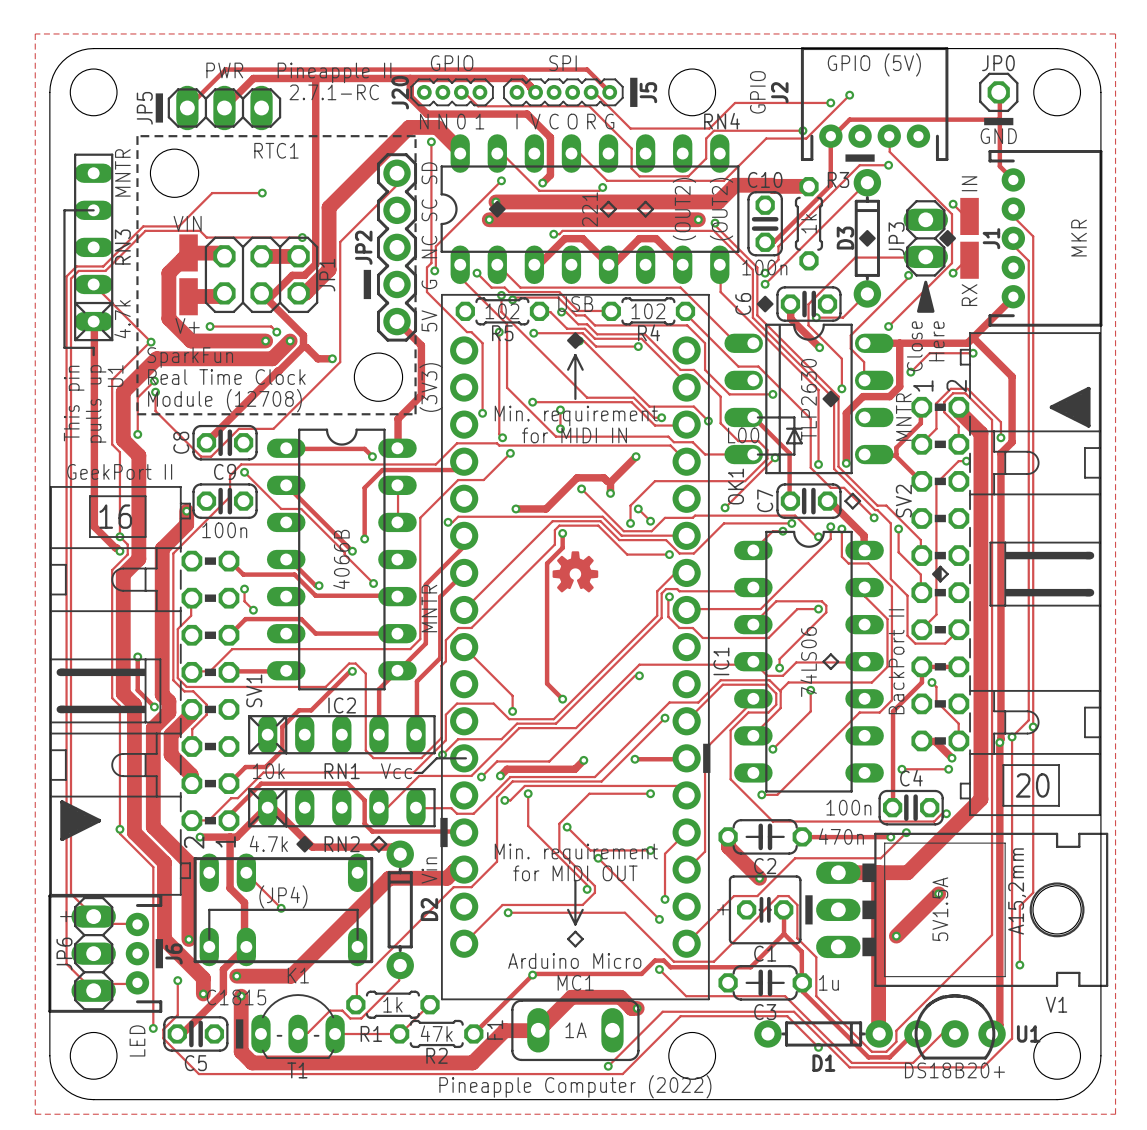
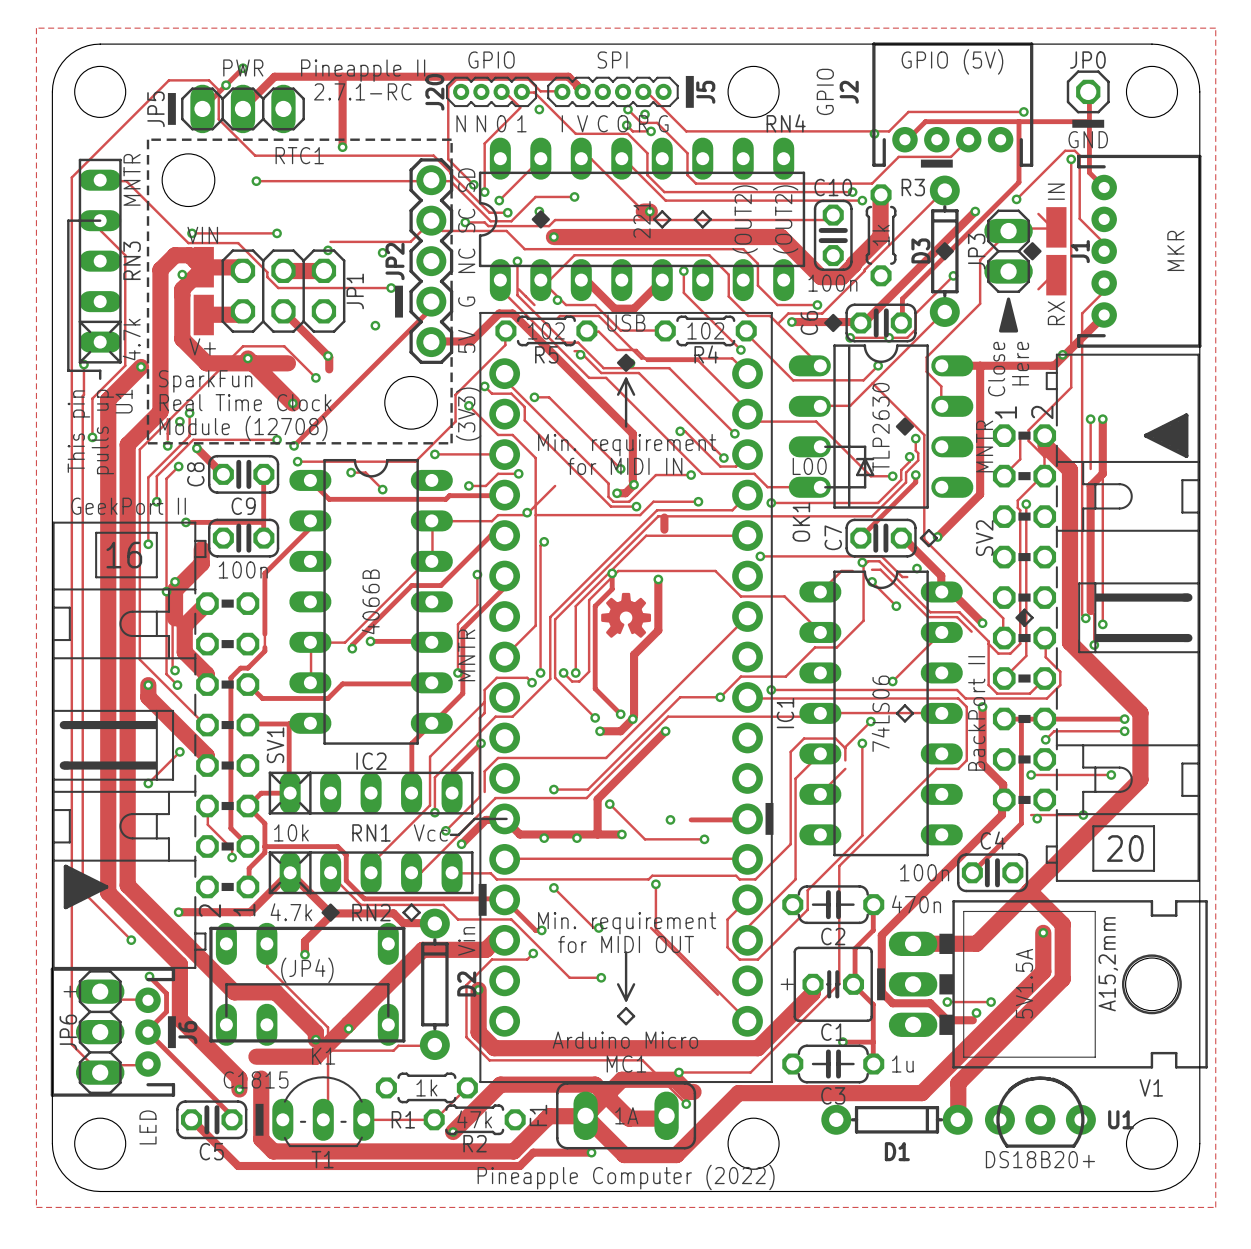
track: (224, 70) (587, 69) (609, 92) -> none
via: none -> (243, 68)
track: (410, 78) (410, 97) (426, 114) (527, 114) (550, 137) (550, 175) (542, 183) -> none
via: none -> (226, 85)
track: none -> (562, 91) (540, 91) (528, 79) (456, 79) (448, 87) (448, 159) (473, 184)
track: (849, 95) (834, 110) -> (1023, 111) (908, 111)
via: (849, 95) -> none
track: (830, 102) (735, 102) (709, 128) -> (889, 131) (772, 131)
via: (830, 102) -> none
track: (478, 106) (589, 106) (603, 120) -> (627, 109) (641, 122) (657, 122)
track: none -> (520, 107) (484, 143) (484, 192)
via: none -> (539, 109)
via: none -> (627, 109)
via: none -> (1023, 111)
via: none -> (644, 114)
track: none -> (1019, 121) (1019, 182) (902, 298) (901, 322)
track: none -> (626, 125) (632, 131) (651, 131)
via: none -> (626, 125)
via: none -> (651, 131)
track: (816, 128) (806, 138) (766, 138) (723, 180) (607, 180) -> (852, 192) (664, 192) (660, 188)
track: (802, 130) (713, 130) (706, 138) (706, 158) (688, 176) -> (968, 139) (950, 156) (898, 156) (872, 183) (749, 183)
track: (830, 136) (830, 185) (774, 242) (765, 242) -> none
track: (889, 136) (889, 151) (952, 214) (952, 263) (888, 326) -> none
track: (431, 141) (431, 263) (426, 267) (426, 292) (467, 332) (471, 332) (482, 343) (482, 381) -> (484, 386) (491, 393) (511, 393) (524, 407)
via: (431, 141) -> none
track: (315, 142) (315, 264) (304, 275) (292, 275) (270, 297) (261, 293) -> none
via: none -> (342, 147)
track: (460, 153) (459, 149) (436, 127) (409, 127) (329, 207) (329, 269) (305, 293) (298, 293) -> none
track: (497, 153) (502, 154) (539, 190) (599, 190) (602, 187) -> (540, 158) (499, 200)
track: (573, 154) (580, 154) (594, 168) -> (521, 91) (534, 92) (575, 133) (627, 133) (647, 153) (647, 175)
track: none -> (624, 159) (665, 200) (862, 200)
via: none -> (1071, 159)
track: (888, 165) (859, 165) (778, 246) (778, 259) (765, 273) -> none
via: (888, 165) -> none
track: none -> (431, 180) (450, 181) (490, 221) (511, 221) (535, 196) (574, 196)
via: none -> (256, 181)
track: (396, 174) (396, 185) (340, 242) (340, 362) (273, 428) (238, 428) (211, 456) (201, 456) (155, 411) -> (431, 181) (256, 181)
via: none -> (473, 184)
track: (501, 180) (435, 246) (434, 270) -> none
via: (501, 180) -> none
via: (542, 183) -> none
via: none -> (484, 192)
via: none -> (852, 192)
track: (808, 186) (735, 185) (718, 201) (597, 201) -> (881, 194) (880, 237) (841, 277) (821, 277) (780, 237) (553, 237)
via position: (602, 187) -> (649, 211)
via: none -> (574, 196)
via: none -> (499, 200)
via: none -> (862, 200)
track: (262, 193) (212, 193) (178, 226) (143, 226) (103, 266) (76, 266) (66, 276) (67, 965) -> (507, 212) (489, 212) (433, 155) (255, 155) (218, 119) (218, 90) (209, 80) (168, 80) (71, 177) (71, 1044)
via: (262, 193) -> none
track: (495, 201) (591, 201) -> (581, 158) (591, 159) (643, 211)
track: none -> (975, 211) (864, 322) (791, 322)
via: none -> (975, 211)
via: none -> (507, 212)
via position: (953, 204) -> (1016, 199)
track: none -> (833, 215) (828, 220) (555, 220) (549, 226) (488, 226) (484, 222) (465, 222)
track: (1013, 209) (1014, 217) (1033, 236) (1033, 892) (1019, 906) (1019, 965) -> none
track: none -> (100, 220) (100, 230) (125, 255) (125, 365) (92, 398) (92, 437)
via: none -> (465, 222)
track: (489, 219) (698, 219) -> none
via: (489, 219) -> none
via: (698, 219) -> none
track: none -> (192, 233) (277, 233)
via: none -> (192, 233)
via: none -> (277, 233)
track: (715, 223) (715, 225) (757, 267) (757, 315) (801, 359) -> none
via: (715, 223) -> none
via: none -> (553, 237)
track: none -> (330, 241) (410, 241) (431, 220) (442, 230) (506, 230) (524, 249) (743, 249) (757, 263) (757, 285) (777, 305) (817, 305)
track: (174, 230) (145, 230) (105, 270) (78, 270) (71, 278) (71, 893) (93, 916) -> (188, 243) (126, 181) (100, 180)
track: (200, 230) (206, 237) (302, 237) -> (216, 243) (238, 243) (267, 272) (267, 277) (278, 288) (391, 288)
track: (553, 234) (559, 234) (562, 230) (713, 230) (752, 269) (752, 317) (834, 398) (834, 468) (890, 523) (890, 579) -> none
via: (553, 234) -> none
track: (1013, 238) (1014, 246) (1028, 260) (1028, 720) (1012, 737) (1012, 1038) (983, 1067) (849, 1067) (794, 1011) (662, 1011) (608, 1066) -> (1104, 251) (1104, 243) (1079, 218) (1079, 155) (1074, 150) (1065, 150) (1016, 199)
via: none -> (382, 252)
track: none -> (517, 261) (517, 295) (564, 342) (578, 342) (603, 368) (669, 368) (734, 433)
via: none -> (517, 261)
track: none -> (203, 267) (189, 255) (175, 255) (160, 269) (160, 411) (127, 444) (127, 885) (234, 992) (275, 992) (315, 1032) (315, 1039)
track: (794, 255) (765, 284) -> (864, 269) (822, 313) (788, 313) (777, 323)
track: none -> (683, 271) (683, 292) (740, 349)
via: none -> (683, 271)
track: (925, 256) (855, 257) (808, 304) (808, 325) (841, 358) (841, 388) -> none
via: none -> (182, 274)
via: none -> (953, 275)
track: (534, 264) (539, 264) (564, 238) (582, 238) (608, 264) (614, 263) (639, 238) (656, 238) (682, 264) -> (581, 280) (586, 280) (614, 308) (634, 308) (662, 280)
track: (719, 264) (720, 292) (818, 389) (818, 464) -> none
track: none -> (1104, 283) (1104, 291) (1082, 313) (1082, 614) (1085, 618)
via: (434, 270) -> none
via: none -> (391, 288)
track: (460, 273) (460, 277) (507, 324) (507, 387) (556, 436) (668, 436) (673, 442) -> (500, 289) (589, 377) (606, 377) (702, 473) (733, 473)
via: (477, 273) -> none
via: (765, 273) -> none
via: (953, 273) -> none
track: (908, 275) (899, 286) -> (1056, 227) (1011, 228) (1008, 231) (980, 260) (980, 303)
via: (908, 275) -> none
via: none -> (557, 300)
track: (93, 284) (151, 342) (112, 379) (112, 444) (119, 452) (119, 536) (127, 544) (127, 554) (112, 570) (112, 698) (119, 705) (119, 833) (153, 867) (153, 1028) -> none
track: none -> (431, 301) (431, 308) (294, 445)
via: (765, 284) -> none
track: (491, 287) (504, 287) (509, 292) (559, 292) (578, 310) -> (595, 305) (620, 330) (629, 330)
track: (547, 287) (680, 287) (736, 343) (752, 343) -> (540, 280) (550, 279) (574, 255) (709, 255) (728, 274) (728, 296) (748, 315) (770, 315) (819, 365)
via: none -> (817, 305)
track: (501, 295) (501, 312) (587, 397) (633, 397) (653, 417) (661, 417) -> none
via: (501, 295) -> none
track: (550, 297) (558, 297) (576, 315) (584, 315) (594, 325) (687, 325) (705, 343) (705, 369) (729, 394) -> (598, 315) (641, 358) (732, 358) (747, 373)
via: (512, 299) -> none
via: none -> (791, 322)
track: (790, 304) (790, 318) (819, 347) -> none
via: none -> (375, 325)
track: none -> (505, 330) (505, 345) (455, 394) (455, 421) (415, 461) (297, 461)
track: (561, 312) (566, 312) (578, 324) (587, 324) (597, 334) (644, 334) (680, 369) (693, 369) (720, 396) (720, 423) (738, 441) (758, 441) (767, 450) (767, 458) (745, 481) -> (915, 438) (918, 460) (906, 472) (906, 482) (872, 516) (811, 516)
via: (561, 312) -> none
track: none -> (850, 337) (889, 337)
via: none -> (850, 337)
track: (832, 317) (842, 317) -> (907, 337) (915, 329) (915, 313) (953, 275)
track: none -> (918, 337) (850, 405) (820, 406)
track: (93, 321) (94, 526) (119, 551) -> none
track: (397, 321) (421, 345) (421, 395) (398, 418) (397, 448) -> (431, 342) (471, 341) (499, 313) (512, 313) (632, 433) (634, 484) (625, 493) (617, 493)
track: (210, 326) (271, 326) (276, 332) -> none
via: (210, 326) -> none
via: (888, 326) -> none
via: none -> (740, 349)
track: none -> (574, 351) (579, 351) (601, 373) (638, 373) (723, 458)
via: (276, 332) -> none
track: (499, 332) (499, 434) (502, 437) -> none
via: (499, 332) -> none
track: (533, 333) (582, 333) (596, 346) (638, 346) -> none
via: none -> (328, 356)
track: none -> (247, 358) (292, 403)
via: none -> (247, 358)
track: (973, 337) (1012, 376) (1012, 392) -> none
via: (265, 341) -> none
track: (290, 341) (272, 358) (156, 358) (123, 392) (123, 440) (138, 455) (138, 559) (123, 574) (123, 693) (134, 704) (134, 832) (164, 862) (164, 939) (166, 941) -> (141, 366) (108, 399) (108, 892) (179, 964) (179, 1019)
via: (290, 341) -> none
track: (579, 341) (583, 341) (649, 406) (693, 406) (708, 421) -> none
track: none -> (83, 364) (82, 891) (131, 940)
via: none -> (83, 364)
via position: (151, 342) -> (141, 366)
via: (638, 346) -> none
via position: (819, 347) -> (878, 365)
track: none -> (504, 373) (505, 380) (608, 483) (608, 496) (613, 501) (629, 501) (655, 475) (691, 475)
track: (973, 353) (929, 353) (910, 372) -> none
via position: (973, 353) -> (1062, 354)
via: none -> (315, 377)
track: (728, 356) (738, 366) (758, 366) (810, 418) (810, 467) (830, 487) (844, 487) (874, 517) -> (793, 380) (863, 380) (878, 365)
track: (332, 358) (317, 358) (303, 346) (206, 442) -> (196, 448) (223, 474)
via: (332, 358) -> none
via: none -> (484, 386)
track: none -> (534, 397) (549, 397) (620, 468)
via: none -> (534, 397)
via: (910, 372) -> none
via: none -> (292, 403)
via: none -> (468, 405)
track: (154, 381) (137, 397) (137, 434) -> none
via: (154, 381) -> none
track: none -> (189, 413) (189, 436) (148, 477) (148, 544)
via: none -> (189, 413)
track: (899, 386) (889, 396) (863, 396) (846, 413) (846, 463) -> (980, 413) (980, 494) (937, 536)
track: none -> (747, 414) (755, 421) (794, 421)
via: (841, 388) -> none
via: (155, 392) -> none
via: none -> (1090, 419)
via: none -> (1102, 419)
track: (482, 393) (482, 413) -> (524, 420) (610, 506) (636, 506)
track: (953, 393) (965, 393) (992, 419) (992, 935) (896, 1030) (896, 1041) (886, 1051) (871, 1051) (816, 996) (816, 957) (797, 938) (797, 904) (788, 896) (778, 896) (713, 961) (673, 961) (624, 912) (508, 912) -> (1038, 420) (1071, 387) (1071, 159)
via: none -> (179, 421)
track: (749, 394) (772, 394) -> (816, 421) (870, 476) (892, 476)
via: (772, 394) -> none
track: (838, 396) (838, 466) (877, 505) (886, 505) (920, 540) (921, 555) -> (913, 424) (924, 434) (924, 539) (978, 594)
track: (532, 402) (631, 402) (655, 425) (686, 425) -> (680, 431) (685, 431) (720, 466) (736, 466) (746, 455)
via: (532, 402) -> none
via: none -> (680, 431)
via: none -> (734, 433)
track: (921, 407) (920, 423) (896, 447) (895, 455) -> none
via: none -> (92, 437)
track: (560, 409) (560, 428) -> none
via: (560, 409) -> none
via: none -> (915, 438)
track: (936, 409) (936, 403) (950, 388) (967, 388) (1000, 422) -> (1090, 419) (1090, 451)
track: none -> (277, 439) (193, 439) (156, 476) (156, 501)
via: none -> (277, 439)
track: (959, 412) (980, 433) (980, 799) (907, 872) (896, 872) -> (1045, 441) (1045, 445) (1070, 470) (1070, 642) (1140, 713) (1140, 779) (976, 943)
via: (482, 413) -> none
via: none -> (167, 445)
via: none -> (294, 445)
via: (661, 417) -> none
track: (753, 417) (789, 453) (790, 501) -> (915, 475) (915, 482) (860, 538)
via: none -> (196, 448)
via: (708, 421) -> none
track: none -> (434, 454) (504, 454)
via: none -> (434, 454)
track: none -> (909, 456) (909, 461) (901, 470) (901, 479) (878, 502) (771, 502)
via: none -> (909, 456)
via: none -> (723, 458)
via position: (560, 428) -> (620, 468)
via: none -> (297, 461)
via: (137, 434) -> none
track: none -> (178, 466) (166, 478) (166, 674) (177, 685)
via: none -> (178, 466)
via: (502, 437) -> none
via: (1000, 437) -> none
track: none -> (351, 472) (365, 472) (382, 489)
via: none -> (351, 472)
track: none -> (263, 474) (263, 538)
via: none -> (518, 473)
track: none -> (1102, 473) (1102, 624)
track: (457, 443) (497, 443) (499, 445) (670, 445) (686, 461) -> (496, 475) (518, 473)
via: none -> (691, 475)
via: none -> (915, 475)
via: none -> (892, 476)
track: (286, 448) (364, 448) (372, 456) -> (311, 481) (329, 499) (445, 499) (449, 495) (504, 495)
via: none -> (634, 484)
via: none -> (468, 485)
track: (446, 453) (435, 464) (241, 464) (230, 475) (230, 496) (173, 553) (173, 680) (184, 691) (193, 691) (206, 704) (206, 714) (192, 729) (191, 746) -> (485, 485) (468, 485)
via: (510, 453) -> none
track: (895, 455) (921, 481) -> none
via position: (372, 456) -> (382, 489)
track: (636, 456) (610, 482) (603, 477) (577, 477) (545, 508) (515, 508) -> none
via: (636, 456) -> none
track: (775, 457) (725, 507) -> none
via: (775, 457) -> none
via: none -> (617, 493)
track: none -> (747, 495) (732, 510) (657, 510) (550, 617) (550, 679) (512, 716) (495, 716) (434, 777) (434, 812)
track: (966, 461) (958, 461) (936, 483) -> (1044, 476) (1042, 476) (1017, 500) (1020, 518)
via position: (966, 461) -> (1026, 504)
track: (463, 462) (455, 470) (382, 470) (364, 487) (364, 539) -> none
via: (846, 463) -> none
via: (818, 464) -> none
via: none -> (156, 501)
track: none -> (698, 501) (653, 501) (640, 515) (535, 515)
via: none -> (698, 501)
via: none -> (771, 502)
track: none -> (1026, 504) (1026, 655) (1020, 662)
track: (244, 472) (281, 508) (301, 508) (373, 583) -> none
via: (244, 472) -> none
via: none -> (636, 506)
via: none -> (527, 512)
track: (655, 481) (630, 505) (630, 523) -> (712, 516) (658, 516) (555, 619) (555, 677) (595, 717)
track: (286, 485) (352, 551) -> (310, 520) (309, 528) (264, 573) (264, 634)
track: none -> (431, 520) (491, 521)
track: (452, 485) (420, 517) (420, 639) (410, 649) (232, 649) (210, 671) (191, 672) -> (315, 377) (284, 346) (243, 346) (139, 449) (139, 659) (204, 723) (207, 725)
track: none -> (185, 522) (263, 522)
via: none -> (185, 522)
track: (581, 488) (623, 531) -> none
via: (581, 488) -> none
via: (610, 493) -> none
track: none -> (504, 535) (490, 535) (440, 585) (411, 585) (352, 645) (352, 648)
track: none -> (747, 535) (646, 535) (575, 606) (575, 672)
via: none -> (937, 536)
track: none -> (544, 541) (540, 545) (540, 672)
via: none -> (148, 544)
via: (725, 507) -> none
via position: (515, 508) -> (544, 541)
track: (638, 508) (650, 521) -> none
via: (638, 508) -> none
via: (186, 511) -> none
track: none -> (760, 556) (881, 556) (902, 577) (907, 577)
via: none -> (760, 556)
via: (874, 517) -> none
via: (650, 521) -> none
track: none -> (431, 561) (425, 562) (345, 642) (310, 642) (310, 682)
track: (448, 522) (452, 522) (458, 516) (602, 516) (621, 535) (686, 535) -> none
via position: (448, 522) -> (477, 574)
via: (630, 523) -> none
track: (791, 523) (723, 523) (693, 553) (679, 553) -> (820, 632) (784, 596) (739, 595)
track: (830, 526) (830, 539) (792, 576) -> (916, 598) (879, 561) (868, 561) (863, 566) (863, 620)
via: (830, 526) -> none
track: (841, 528) (841, 556) -> none
track: (898, 528) (898, 552) -> none
via: (898, 528) -> none
track: none -> (872, 569) (880, 569) (927, 617) (957, 617)
track: (651, 531) (665, 517) (692, 517) (695, 515) (795, 515) (818, 536) -> (709, 570) (715, 570) (725, 580)
via: (782, 531) -> none
track: none -> (477, 574) (477, 604) (457, 624) (457, 672)
via: (119, 536) -> none
via: (818, 536) -> none
via: (364, 539) -> none
track: none -> (658, 579) (658, 630) (634, 654) (632, 719) (620, 731) (600, 731)
via: none -> (658, 579)
track: (666, 540) (619, 540) (600, 521) (552, 521) (492, 581) -> (468, 405) (498, 434) (512, 434) (535, 458) (535, 625)
via: none -> (175, 581)
track: none -> (872, 581) (896, 606)
via: none -> (872, 581)
track: (554, 544) (554, 530) (559, 525) (598, 525) (627, 554) (669, 554) -> (603, 585) (618, 570) (678, 570)
via: none -> (166, 591)
track: none -> (941, 591) (953, 594) (982, 623)
via: (119, 551) -> none
via: (352, 551) -> none
via: (669, 554) -> none
track: (541, 557) (471, 627) (457, 629) -> (589, 600) (589, 671) (579, 681) (572, 681) (563, 672)
track: (286, 559) (290, 560) (315, 585) (319, 585) -> none
track: none -> (207, 603) (184, 625) (184, 652) (206, 674) (207, 684)
track: (228, 561) (243, 574) (294, 574) (315, 595) (341, 595) -> none
via: none -> (896, 606)
track: (848, 563) (868, 563) (878, 573) -> (924, 606) (930, 612) (959, 612) (970, 623)
track: (1000, 567) (999, 1025) (992, 1033) -> (1090, 611) (1094, 614) (1094, 645)
track: (464, 572) (440, 596) (440, 658) (416, 681) (416, 714) -> (481, 743) (453, 771)
track: (686, 573) (675, 573) (657, 591) (657, 615) (553, 719) (509, 719) (493, 703) (457, 703) -> (746, 617) (606, 757) (496, 759)
track: (162, 574) (162, 694) (168, 701) (168, 712) (153, 728) (153, 827) (188, 862) (188, 939) -> (175, 618) (172, 620) (172, 668) (175, 670)
via: none -> (1085, 618)
via: none -> (982, 623)
via: none -> (1102, 624)
via: (373, 583) -> none
via: (319, 585) -> none
track: (891, 586) (891, 700) (887, 704) -> (966, 719) (966, 760)
track: (753, 587) (749, 591) (679, 591) (677, 589) (666, 589) (661, 593) (661, 617) (556, 723) (517, 723) (501, 739) -> none
track: (864, 587) (865, 596) (887, 619) (887, 655) -> (941, 632) (892, 681)
via: (244, 589) -> none
track: none -> (1044, 638) (1045, 657) (1060, 671) (1060, 685) (1046, 698) (965, 698) (957, 689) (771, 689)
via: none -> (370, 641)
track: (669, 596) (668, 616) (680, 627) -> (553, 789) (587, 789) (680, 697) (720, 697) (740, 676)
via: (669, 596) -> none
track: (936, 597) (936, 614) -> (1020, 643) (1010, 653) (998, 653) (988, 643)
track: (191, 598) (191, 615) (177, 629) (177, 678) (186, 686) (325, 686) (349, 663) (355, 663) (365, 673) (365, 750) (373, 758) (421, 758) -> (445, 830) (457, 818)
via: none -> (1094, 645)
track: (244, 601) (253, 610) -> none
track: (768, 601) (760, 609) (686, 610) -> (836, 647) (814, 647) (785, 676) (754, 676)
via: none -> (352, 648)
track: (818, 609) (797, 609) (768, 638) (702, 638) (692, 627) -> none
via: (818, 609) -> none
via: (253, 610) -> none
via: none -> (175, 670)
via: none -> (457, 672)
via: none -> (540, 672)
via: none -> (563, 672)
via: none -> (575, 672)
track: (753, 624) (776, 601) (821, 601) (826, 605) (826, 612) (779, 659) (779, 668) -> none
track: none -> (496, 677) (527, 677) (532, 682)
via: none -> (892, 681)
track: (397, 633) (315, 633) (301, 619) (245, 619) (228, 635) -> (431, 682) (342, 683) (328, 698) (262, 698) (247, 684)
via: none -> (532, 682)
via: none -> (148, 685)
via: none -> (177, 685)
track: (547, 639) (547, 683) (562, 699) -> (595, 688) (620, 714)
via: none -> (771, 689)
via: none -> (720, 697)
track: (464, 647) (512, 695) (512, 711) -> none
track: none -> (747, 697) (958, 698) (966, 706)
track: none -> (484, 702) (430, 756) (430, 805) (371, 863) (371, 872)
track: none -> (982, 706) (982, 764) (1003, 784) (1004, 799) (1002, 802) (1002, 815) (881, 935) (881, 992) (892, 1003) (930, 1003) (947, 1020) (972, 1020)
via: none -> (982, 706)
track: (137, 656) (137, 690) (154, 706) -> none
via: (137, 656) -> none
track: (753, 661) (767, 675) (782, 675) (796, 662) (864, 661) -> (820, 713) (941, 713)
via: none -> (620, 714)
track: (639, 664) (576, 728) (519, 728) (471, 775) (419, 775) -> (695, 716) (668, 716) (586, 798) (545, 798)
via: none -> (595, 717)
via: none -> (632, 719)
track: (887, 666) (871, 682) (788, 682) (780, 690) -> none
track: (921, 666) (921, 682) (893, 711) (893, 807) -> (1021, 719) (1021, 823) (972, 872)
track: none -> (1044, 718) (1124, 719)
via: none -> (1124, 719)
via: (779, 668) -> none
track: none -> (870, 721) (844, 747)
via: none -> (870, 721)
track: none -> (289, 723) (290, 793) (261, 793) (247, 806) (264, 823) (264, 852) (249, 868) (249, 880)
track: (352, 671) (350, 671) (311, 710) (299, 710) (282, 726) (282, 750) (265, 767) (245, 767) (228, 783) -> (264, 647) (264, 651) (247, 668) (240, 668) (230, 677) (230, 828) (247, 846)
via: (352, 671) -> none
track: (639, 675) (634, 675) (549, 761) (497, 761) (481, 777) -> none
via: (639, 675) -> none
via: none -> (600, 731)
track: none -> (665, 731) (597, 799) (597, 834)
via: none -> (665, 731)
track: none -> (1124, 731) (1054, 731) (1045, 739)
via: none -> (1124, 731)
track: (931, 682) (936, 686) (936, 701) (958, 723) (958, 740) -> none
via: (931, 682) -> none
track: (738, 684) (722, 684) (686, 721) -> (804, 738) (790, 751) (790, 844) (755, 879) (739, 879) (736, 875) (652, 875) (648, 879) (515, 879)
via: none -> (1045, 739)
via: none -> (481, 743)
via: none -> (862, 743)
track: (810, 690) (810, 711) (772, 749) -> none
via: (810, 690) -> none
track: none -> (179, 751) (148, 783)
via: none -> (179, 751)
via: (562, 699) -> none
track: (752, 699) (752, 701) (705, 749) (705, 851) (687, 869) -> (795, 841) (795, 879) (748, 926) (748, 940)
track: (776, 704) (768, 712) (748, 712) (730, 730) -> (819, 754) (795, 778) (795, 788)
via: (154, 706) -> none
track: (191, 709) (191, 714) (171, 734) (171, 754) (191, 774) (191, 783) -> (207, 765) (206, 755) (148, 697) (148, 685)
via position: (512, 711) -> (553, 789)
track: (776, 712) (780, 708) (780, 691) (769, 680) (720, 680) (698, 702) (669, 702) (594, 777) -> (704, 839) (647, 839)
track: (665, 718) (601, 781) (512, 781) (497, 797) (497, 861) (471, 887) -> (533, 953) (527, 959) (512, 959)
via: (665, 718) -> none
track: none -> (1031, 774) (1111, 774)
via: none -> (1031, 774)
via: none -> (1111, 774)
via: none -> (148, 783)
via: (1033, 726) -> none
track: (445, 733) (445, 740) (413, 772) (263, 772) (237, 798) (231, 798) (208, 820) (191, 820) -> none
via: (1012, 737) -> none
track: (458, 739) (442, 754) -> (498, 798) (495, 798) (455, 838)
track: (921, 740) (935, 741) (952, 758) -> none
via: (999, 742) -> none
via: none -> (609, 804)
track: none -> (207, 806) (207, 824) (232, 849) (232, 857)
via: (772, 749) -> none
via: none -> (434, 812)
via: (442, 754) -> none
track: none -> (1031, 815) (1083, 815)
via: none -> (1083, 815)
via: none -> (670, 819)
via: (634, 759) -> none
track: (583, 760) (574, 769) (507, 769) (500, 775) -> none
via: (583, 760) -> none
via: none -> (445, 830)
track: (901, 769) (948, 769) -> none
via: (901, 769) -> none
via: (948, 769) -> none
track: none -> (621, 834) (519, 834) (504, 818) (485, 819) (461, 844)
via: none -> (621, 834)
via: none -> (576, 838)
via: (481, 777) -> none
track: (592, 777) (510, 777) (473, 813) -> (644, 839) (609, 804)
via: none -> (704, 839)
track: (730, 779) (772, 821) (934, 821) (941, 813) (946, 813) -> none
via: none -> (461, 844)
track: (261, 783) (230, 814) -> (283, 846) (264, 846)
track: (311, 783) (347, 783) (364, 800) (364, 823) (372, 831) -> (337, 846) (346, 855) (346, 880) (364, 898) (404, 898)
via: none -> (232, 857)
track: (528, 793) (528, 825) (587, 884) (587, 889) -> none
via: (528, 793) -> none
track: (650, 793) (589, 793) (559, 823) (559, 850) (594, 886) (594, 892) (582, 904) (502, 904) (464, 943) -> none
via: (650, 793) -> none
track: (686, 794) (677, 785) (524, 785) (510, 800) (504, 800) -> (746, 858) (504, 859)
track: (761, 794) (777, 794) -> (678, 1072) (750, 1072) (839, 983) (839, 866) (846, 858)
via: (761, 794) -> none
via: (504, 800) -> none
track: none -> (330, 872) (360, 904) (443, 904) (457, 919) (511, 919) (569, 977) (601, 977)
via: (946, 813) -> none
via: none -> (655, 884)
track: none -> (553, 887) (593, 927) (598, 927)
via: none -> (553, 887)
track: (567, 827) (590, 850) (650, 850) -> none
via: (567, 827) -> none
via: (119, 829) -> none
track: none -> (504, 899) (535, 930) (541, 930)
track: (906, 832) (880, 858) (795, 858) (757, 896) (733, 896) (686, 943) -> (655, 884) (655, 929) (747, 1021)
via: (906, 832) -> none
track: (728, 836) (728, 847) (759, 878) -> none
track: (802, 836) (890, 837) -> (873, 904) (873, 930) (855, 948) (853, 984)
track: (200, 837) (236, 837) (267, 807) (273, 808) (312, 847) (392, 847) (399, 853) -> (330, 913) (393, 913) (403, 923) (433, 923)
via: (200, 837) -> none
track: (230, 837) (230, 888) (244, 902) (244, 943) (246, 946) (223, 969) (223, 992) (183, 1032) (177, 1033) -> (591, 1152) (533, 1152) (519, 1166) (238, 1166) (191, 1119)
via: (890, 837) -> none
track: none -> (178, 912) (250, 912) (290, 872) (330, 913)
via: none -> (178, 912)
track: none -> (330, 913) (329, 917) (304, 941) (304, 954)
via: (650, 850) -> none
track: (668, 850) (665, 853) (665, 899) -> (727, 919) (727, 947) (739, 959) (757, 959) (807, 909) (807, 890) (862, 835) (862, 743)
via: none -> (598, 927)
via: (598, 858) -> none
via: none -> (541, 930)
track: none -> (1043, 932) (1043, 971) (921, 1093) (738, 1093) (676, 1155) (624, 1155) (592, 1123) (585, 1119)
via: none -> (1043, 932)
via: none -> (131, 940)
track: (878, 872) (879, 1033) -> (1029, 890) (1062, 924) (1062, 978) (958, 1083) (957, 1119)
track: (246, 873) (281, 908) -> (267, 944) (267, 966) (328, 1027) (328, 1115) (324, 1118)
via: (759, 878) -> none
via: none -> (533, 953)
track: (453, 887) (356, 983) (355, 1004) -> (493, 959) (466, 985) (466, 1037) (489, 1060) (642, 1060) (686, 1104)
via: (587, 889) -> none
track: (938, 893) (896, 936) -> none
via: (938, 893) -> none
via: (665, 899) -> none
track: none -> (149, 976) (166, 993) (166, 1011) (148, 1032) (230, 1115) (231, 1119)
via: none -> (149, 976)
via: none -> (601, 977)
via position: (281, 908) -> (304, 954)
track: none -> (813, 984) (812, 993) (757, 1048) (494, 1048) (478, 1032) (478, 989)
track: (784, 910) (784, 933) -> none
via: (508, 912) -> none
via: none -> (478, 989)
via: (659, 919) -> none
track: none -> (947, 1002) (991, 1002)
via: none -> (947, 1002)
via: none -> (991, 1002)
track: (784, 933) (801, 951) -> (853, 985) (873, 1004) (873, 1029)
track: (784, 933) (750, 967) (670, 967) (663, 960) (655, 960) (641, 973) (533, 973) (473, 1033) -> none
via: (188, 939) -> none
via: none -> (348, 1028)
via: none -> (315, 1039)
track: none -> (842, 1042) (873, 1042)
via: none -> (842, 1042)
via: (1019, 965) -> none
track: (399, 966) (399, 980) (361, 1018) (350, 1018) (342, 1010) (330, 1010) (307, 1032) (299, 1032) -> (433, 1045) (398, 1045) (393, 1050) (328, 1050)
track: (659, 969) (686, 996) (785, 996) (851, 1062) (913, 1062) (941, 1034) (954, 1033) -> none
via: (659, 969) -> none
via: (532, 975) -> none
via: (236, 976) -> none
track: (203, 978) (203, 993) -> (219, 1059) (239, 1078) (239, 1089)
track: (177, 980) (177, 1015) (163, 1029) (163, 1038) (198, 1074) (622, 1074) (680, 1016) (787, 1016) (818, 1047) -> none
via: (177, 980) -> none
track: (802, 982) (802, 991) (868, 1057) (889, 1057) (913, 1034) (917, 1033) -> none
via: none -> (678, 1072)
via: (203, 993) -> none
via: (241, 996) -> none
via: none -> (239, 1089)
via: (637, 1008) -> none
via: none -> (686, 1104)
via: (153, 1028) -> none
track: none -> (666, 1119) (629, 1118) (595, 1084) (500, 1084) (453, 1132)
via: none -> (453, 1132)
via: (818, 1047) -> none
via: none -> (591, 1152)
via: (608, 1066) -> none

